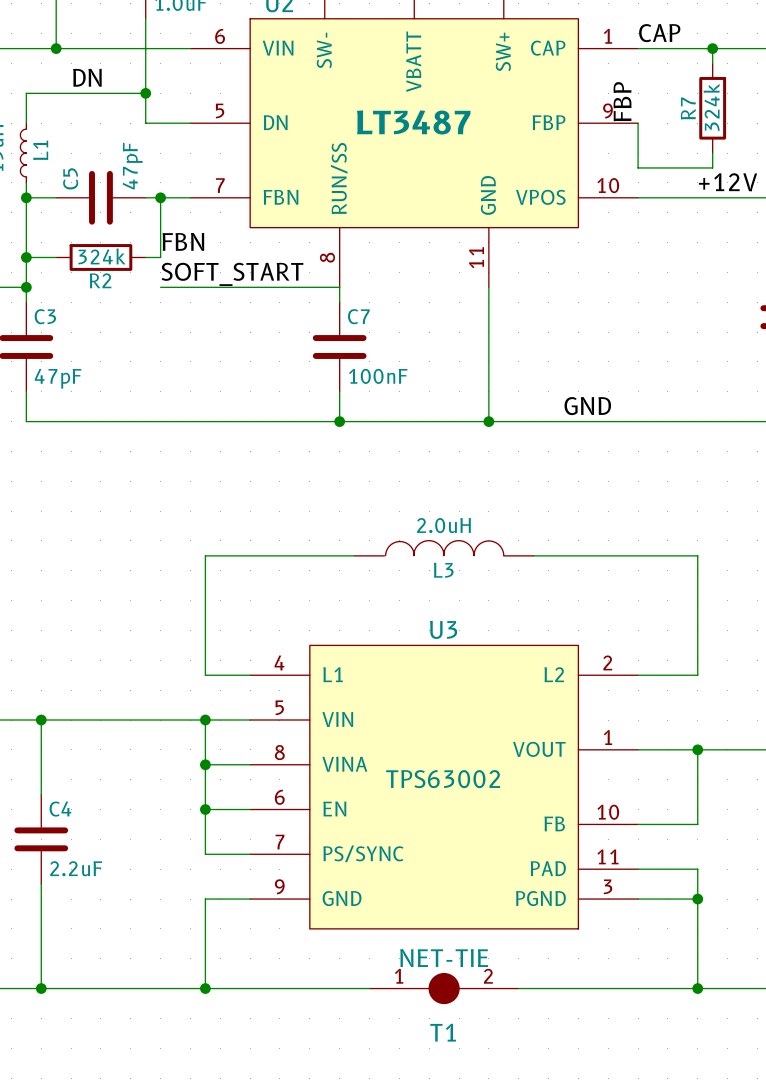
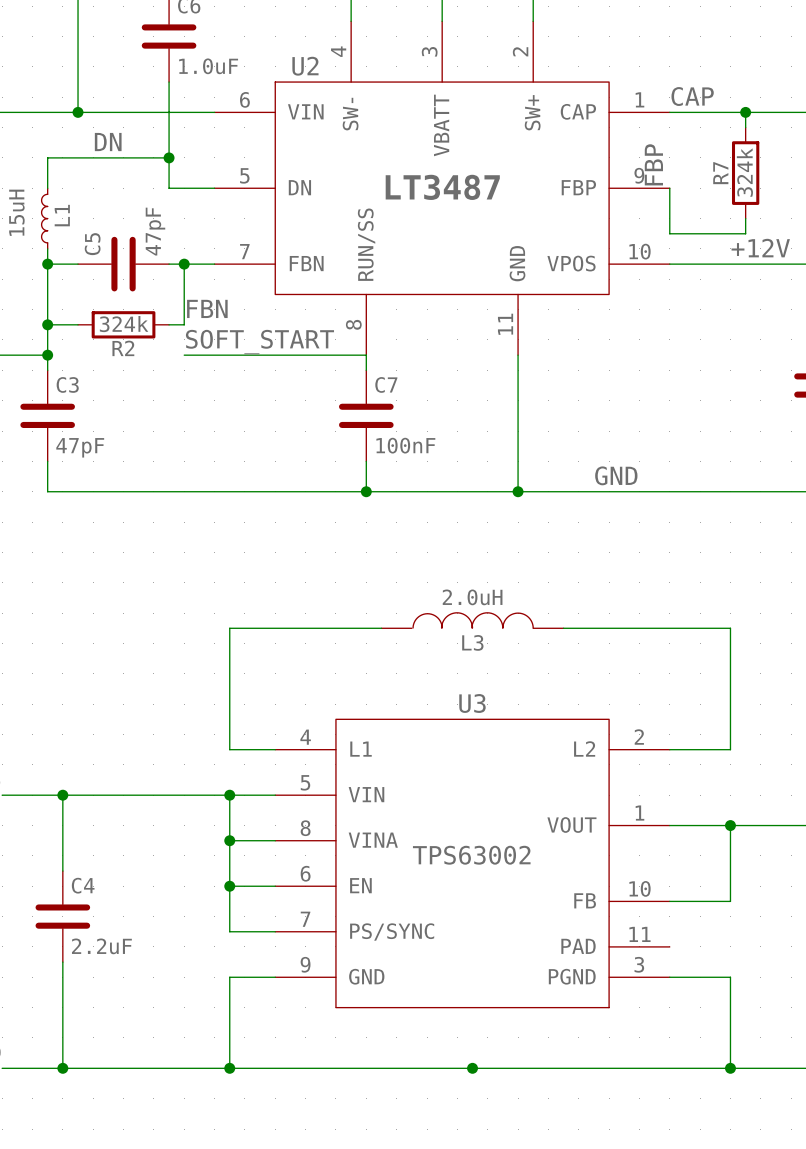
wire: (638, 869) (697, 869) (697, 899) -> none
junction: (697, 899) -> none
T1: NET-TIE (444, 988) -> none
junction: none -> (472, 1068)

